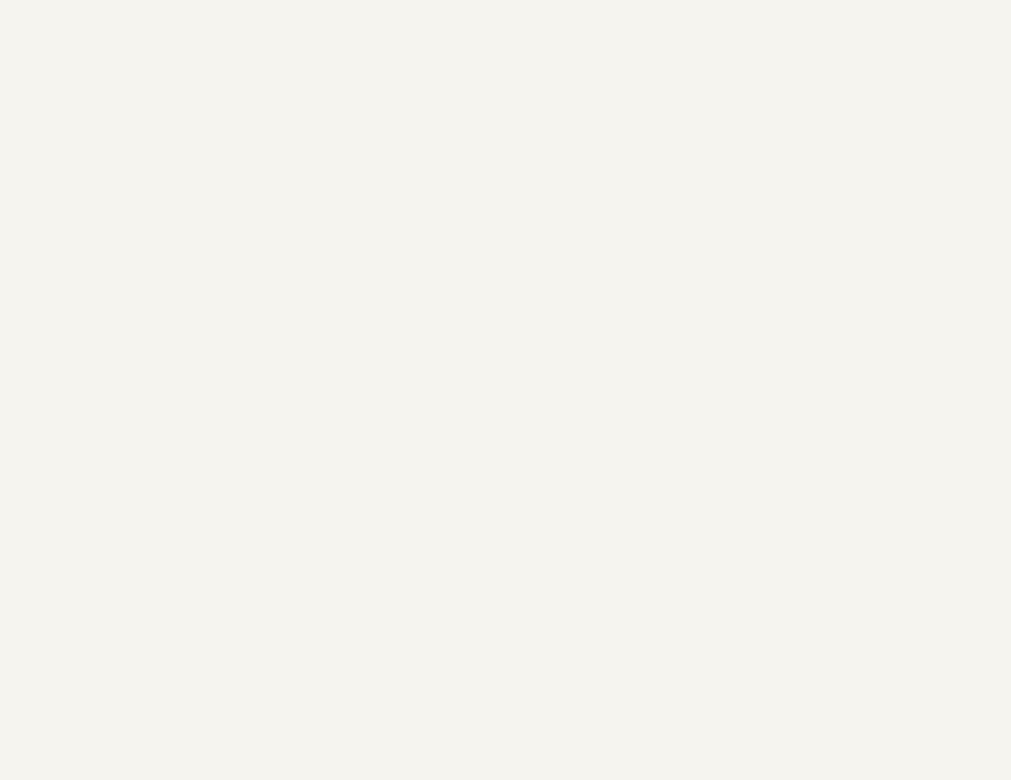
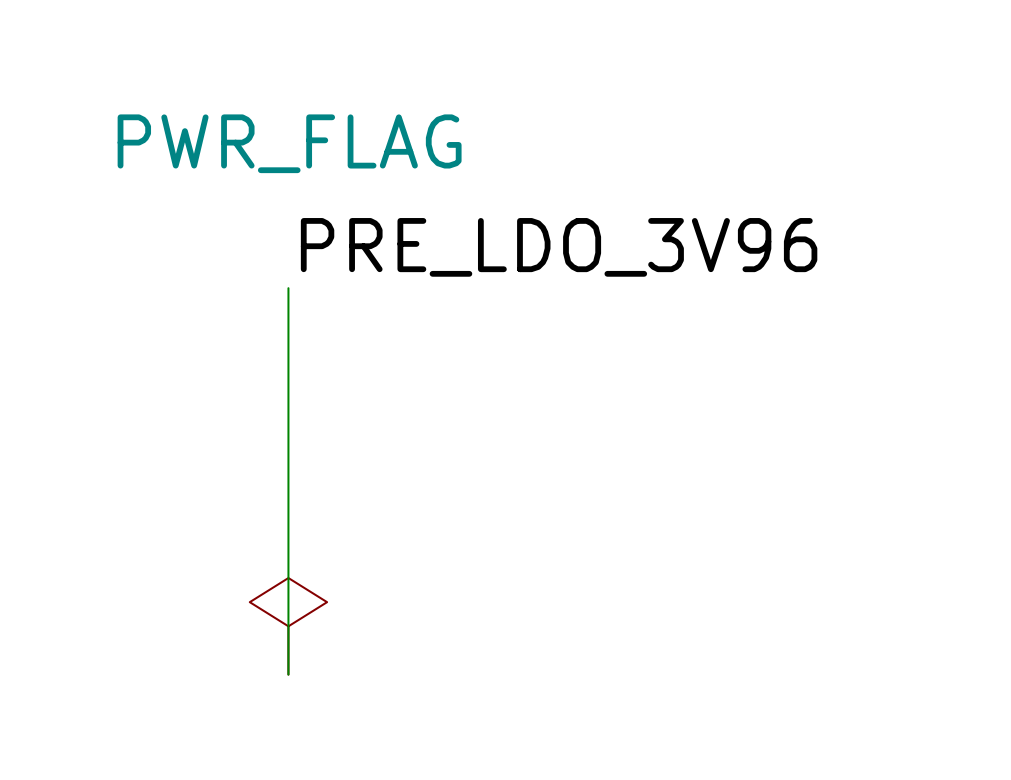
label: none -> PRE_LDO_3V96 (559, 247)
wire: none -> (288, 288) (288, 674)
power symbol: none -> PWR_FLAG (288, 626)

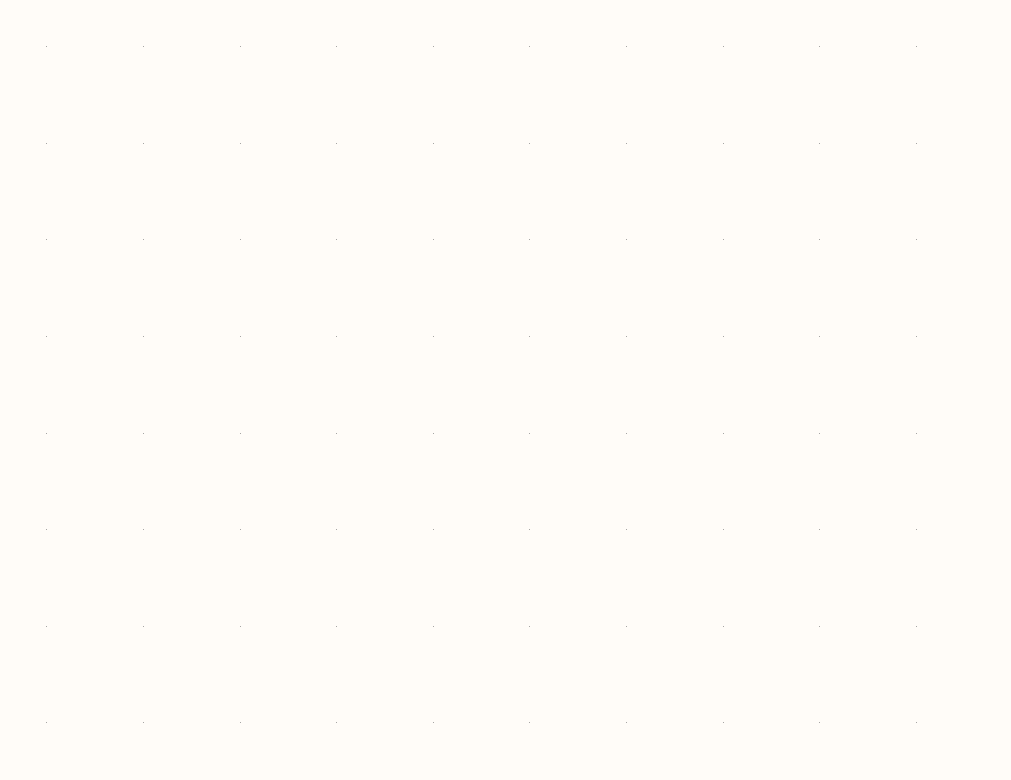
label: PRE_LDO_3V96 (559, 247) -> none
wire: (288, 288) (288, 674) -> none
power symbol: PWR_FLAG (288, 626) -> none

